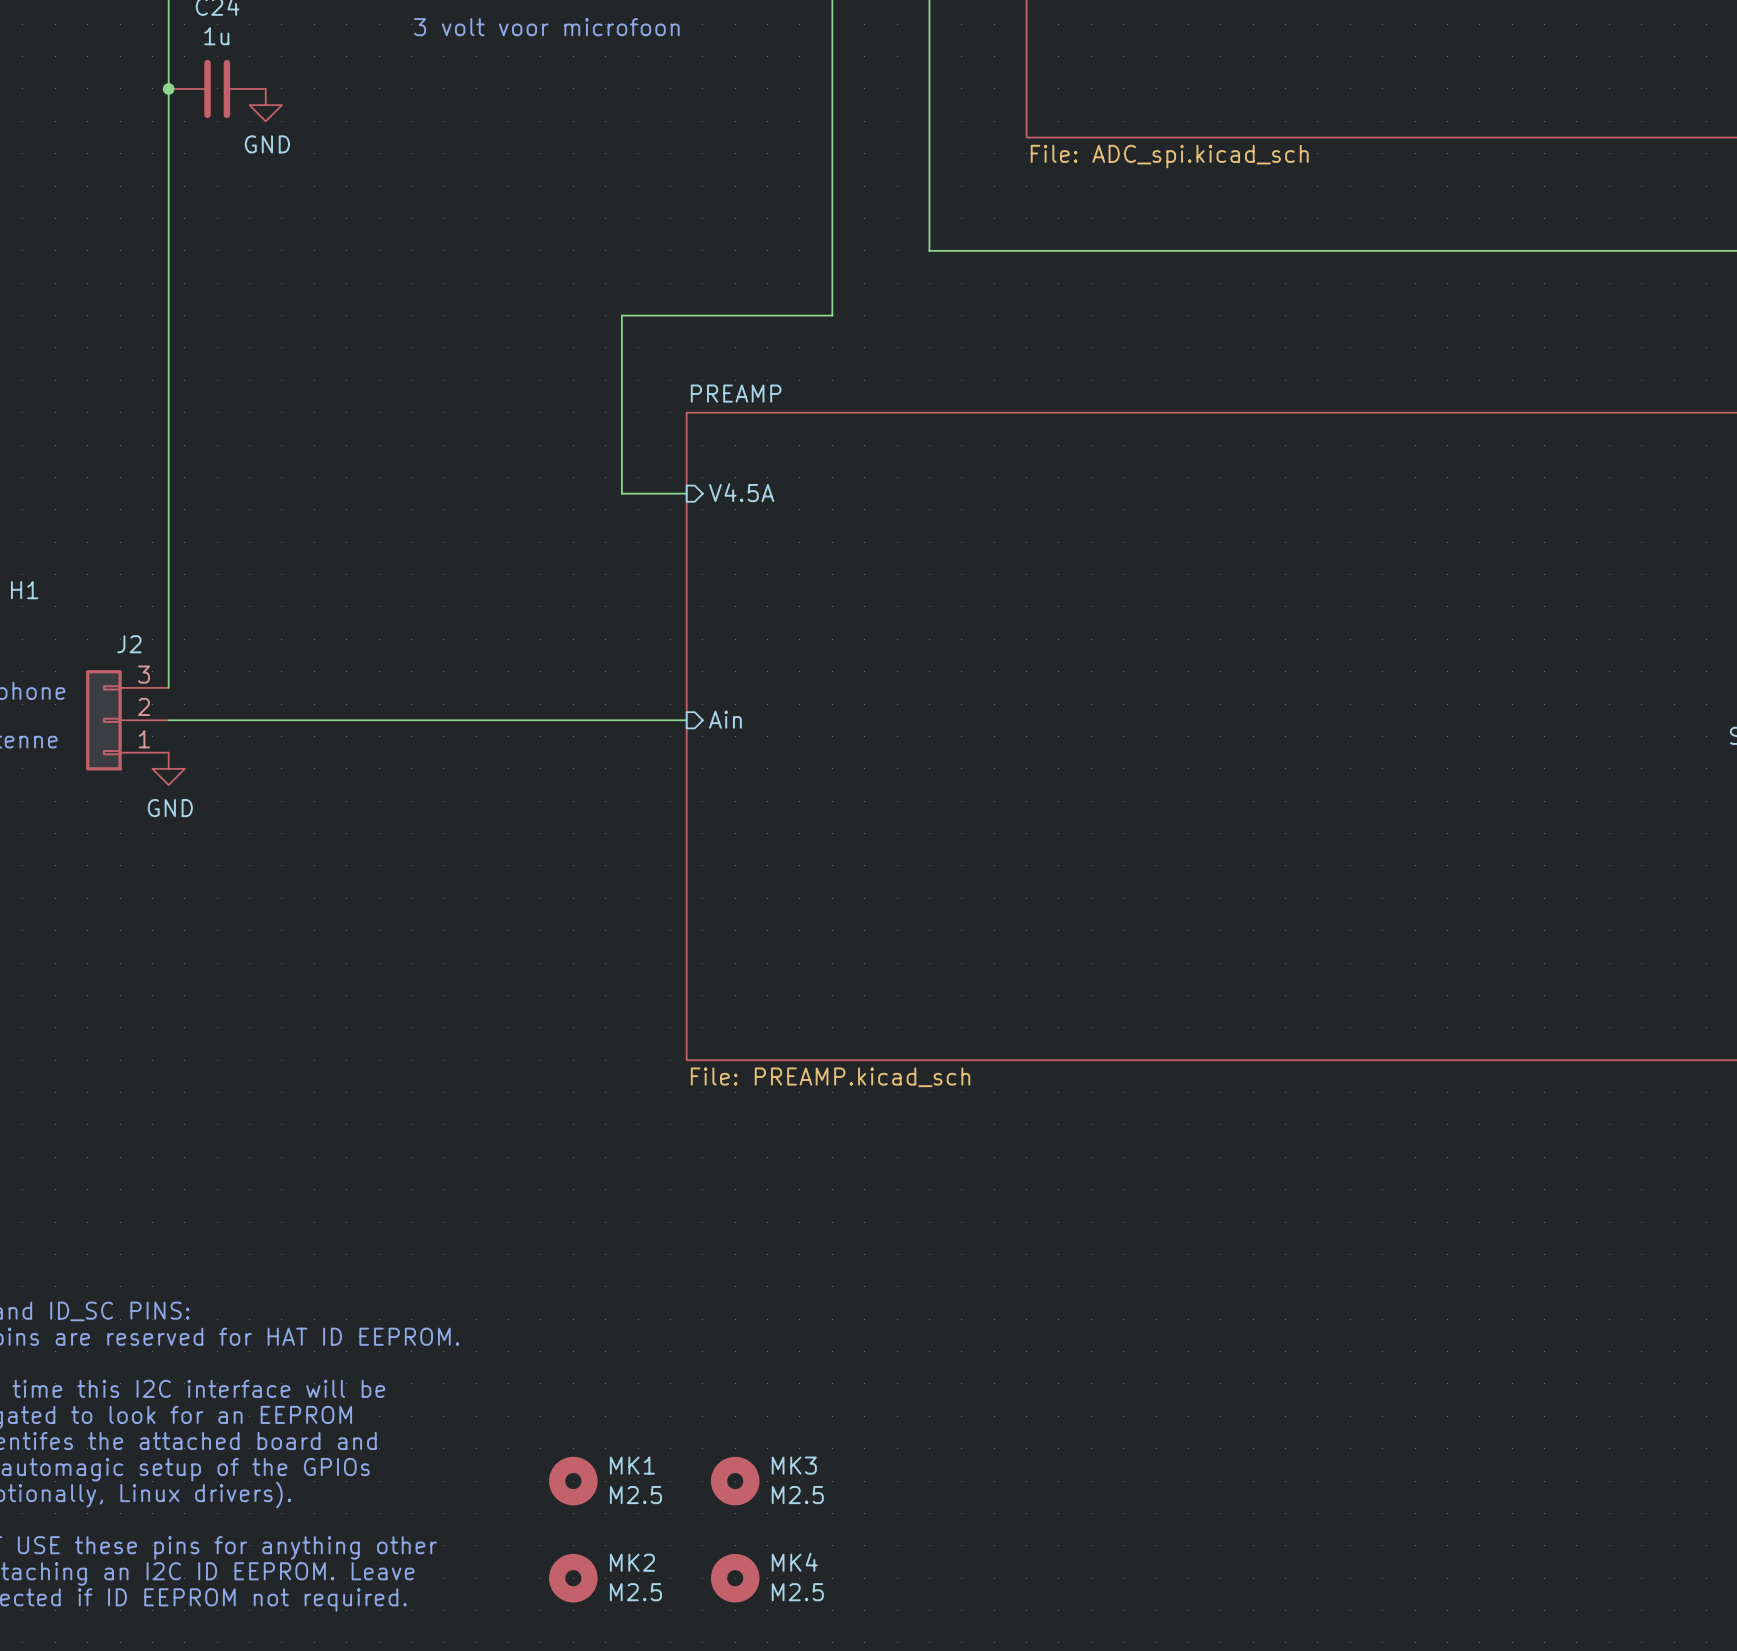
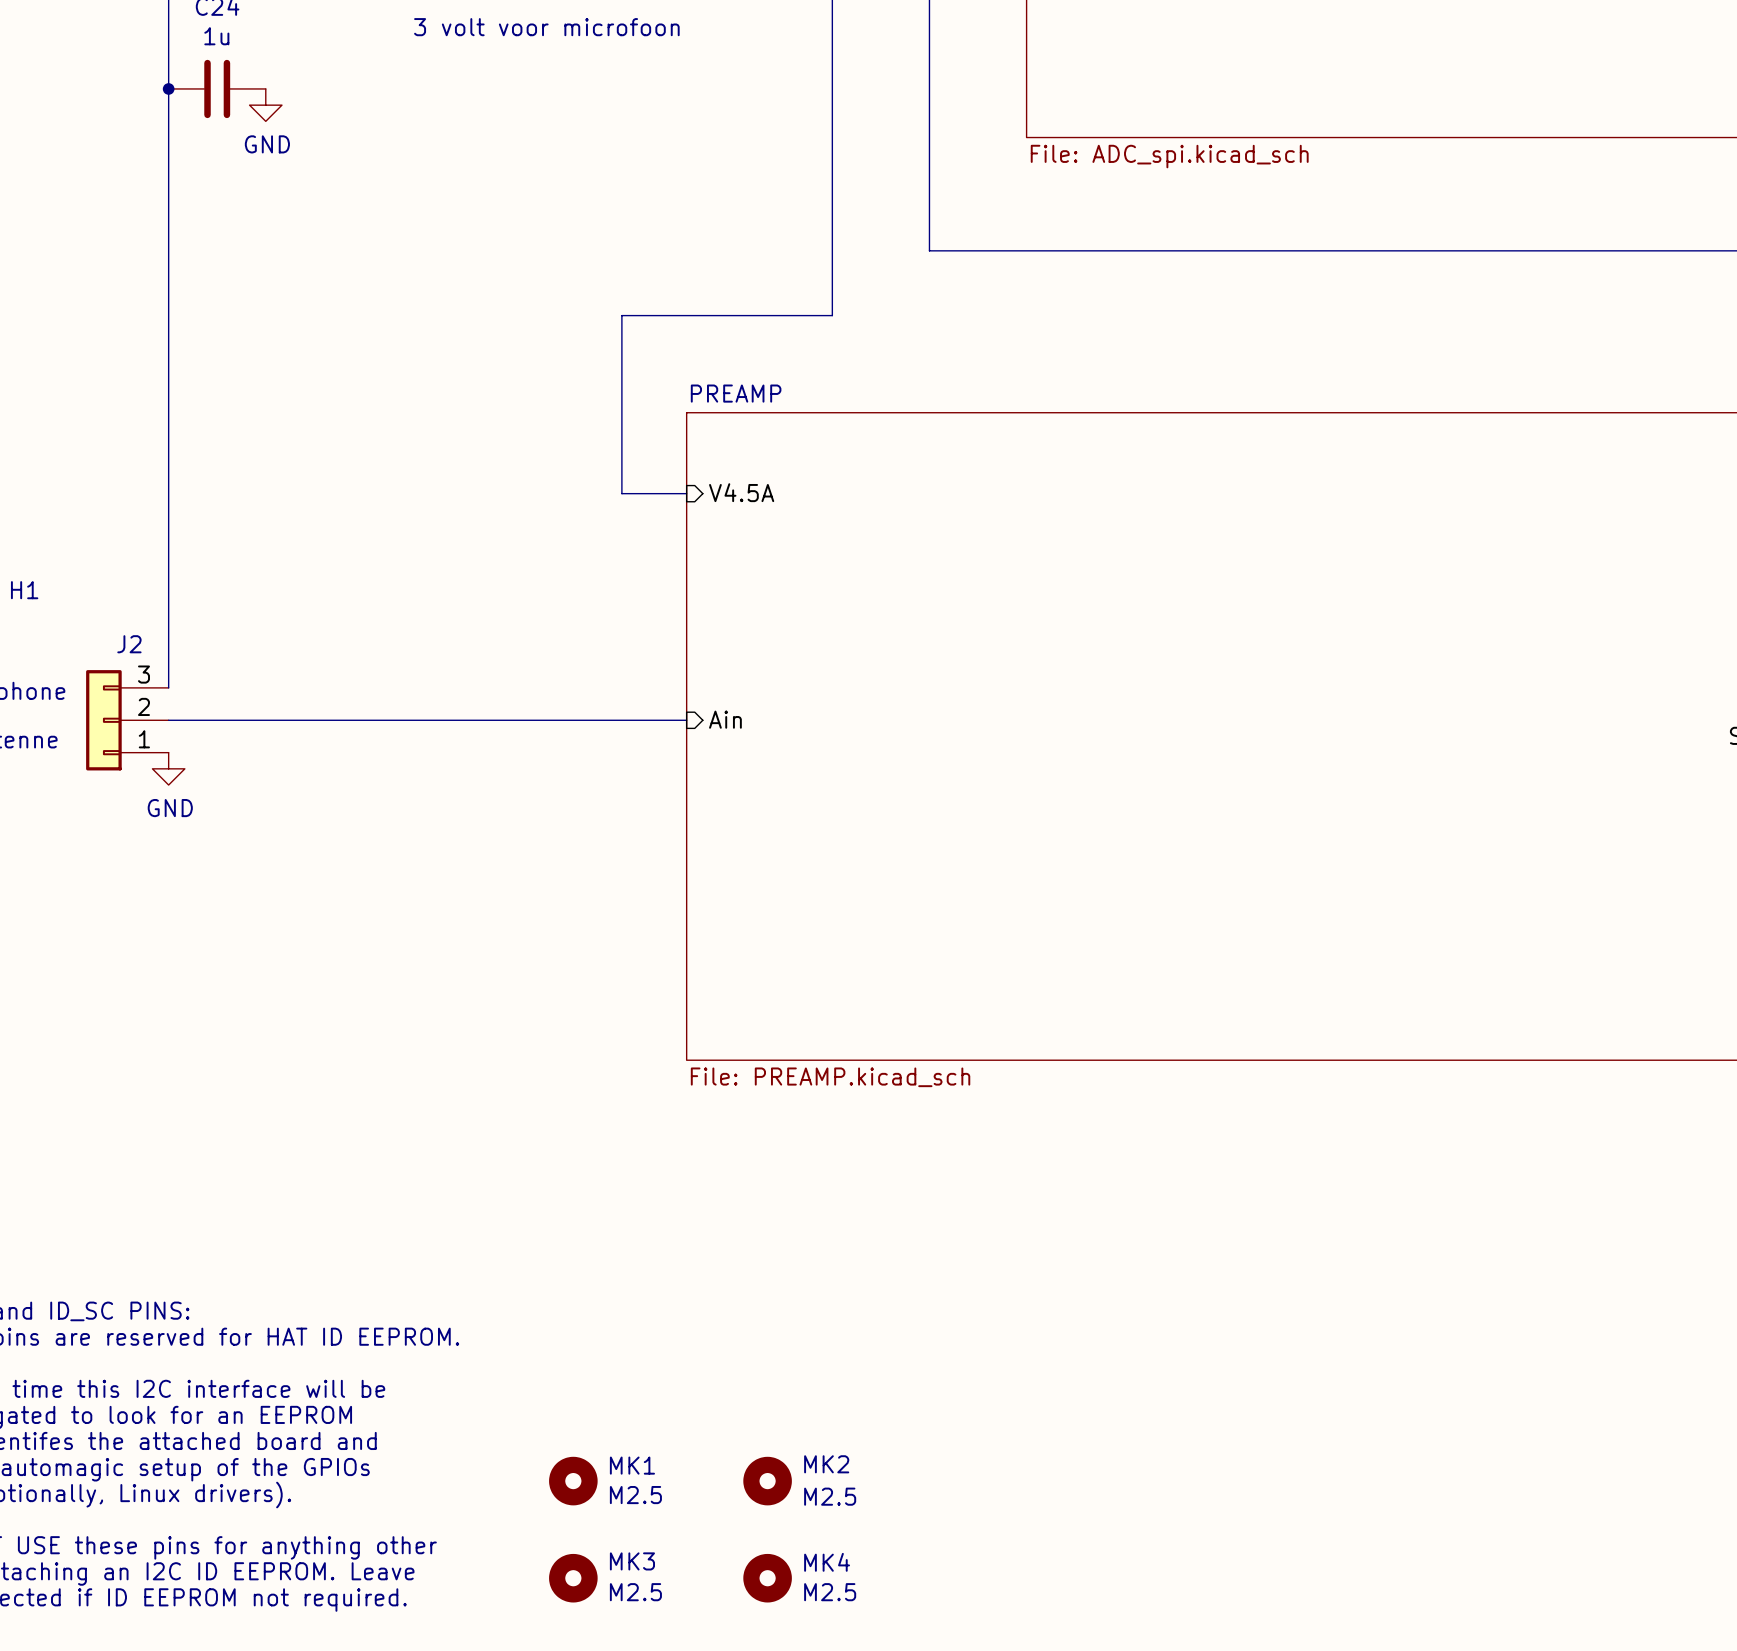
MK3: M2.5 (735, 1481) -> none
MK2: none -> M2.5 (767, 1481)
MK2 name: MK2 (632, 1562) -> MK3 (632, 1561)
MK4 position: (735, 1578) -> (767, 1578)

